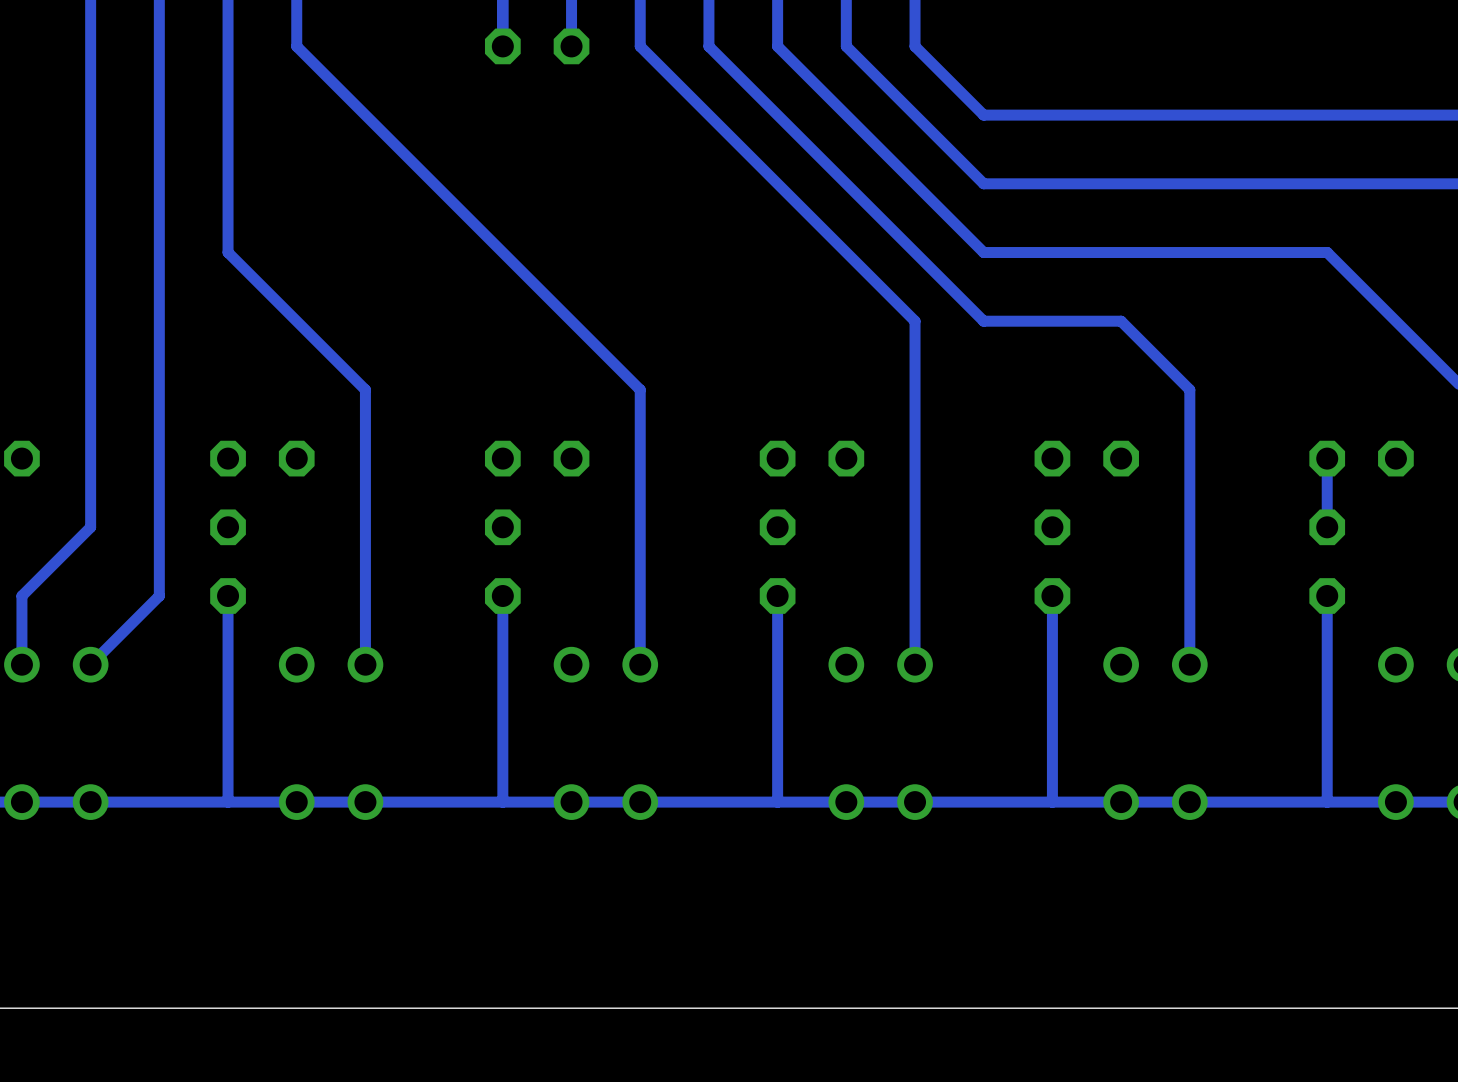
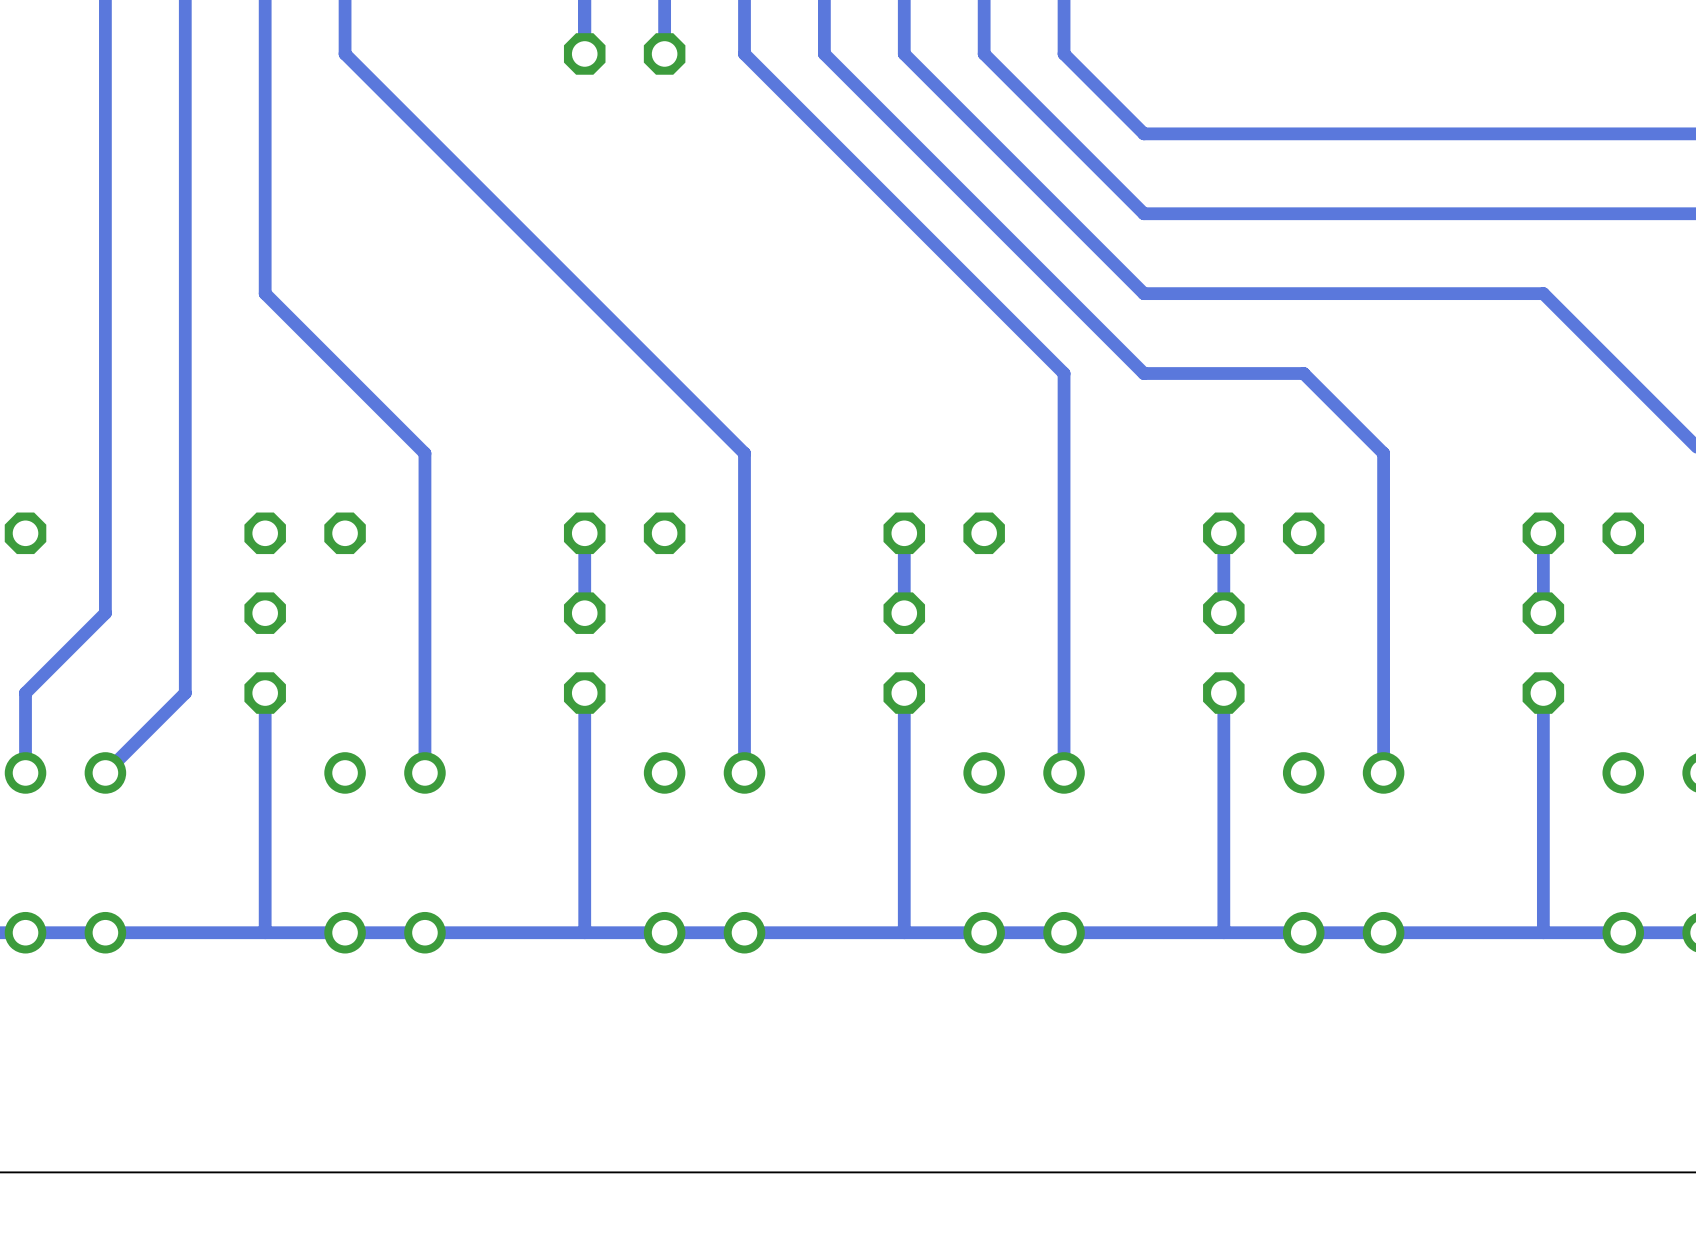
track: none -> (584, 533) (584, 613)
track: none -> (904, 533) (904, 613)
track: none -> (1223, 533) (1223, 613)

